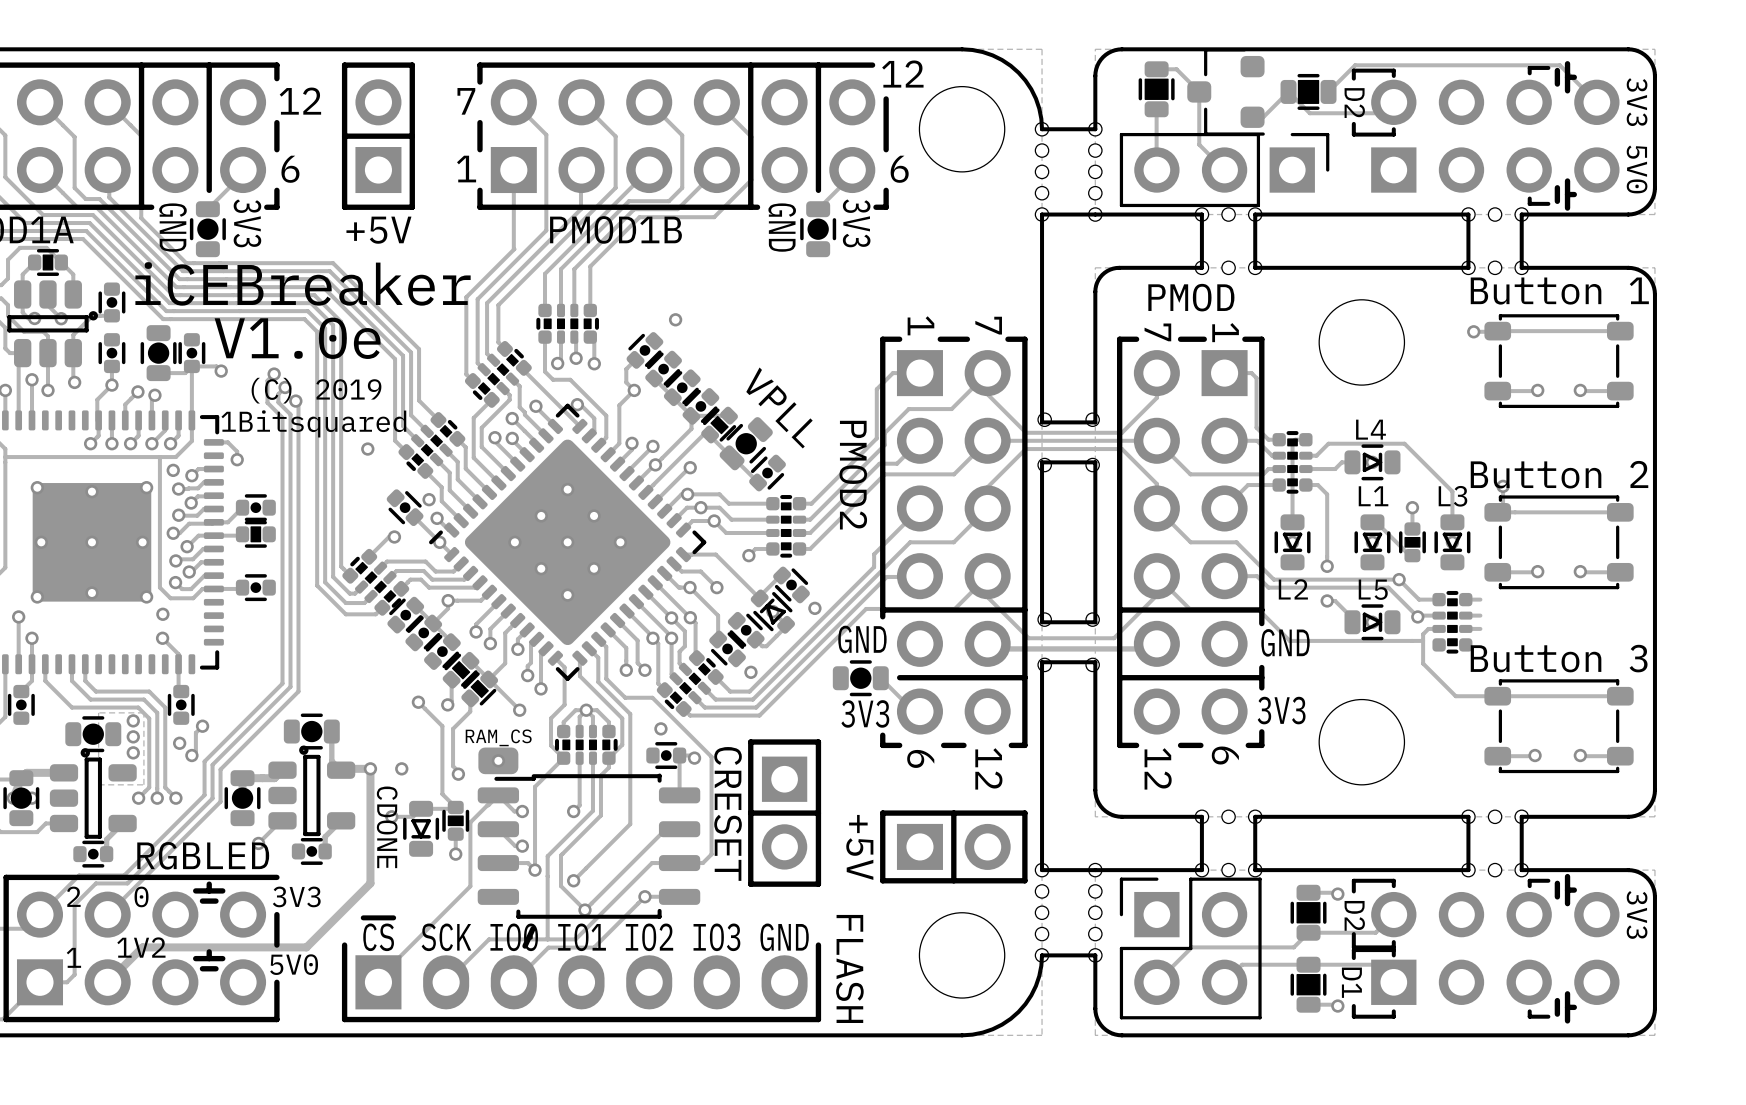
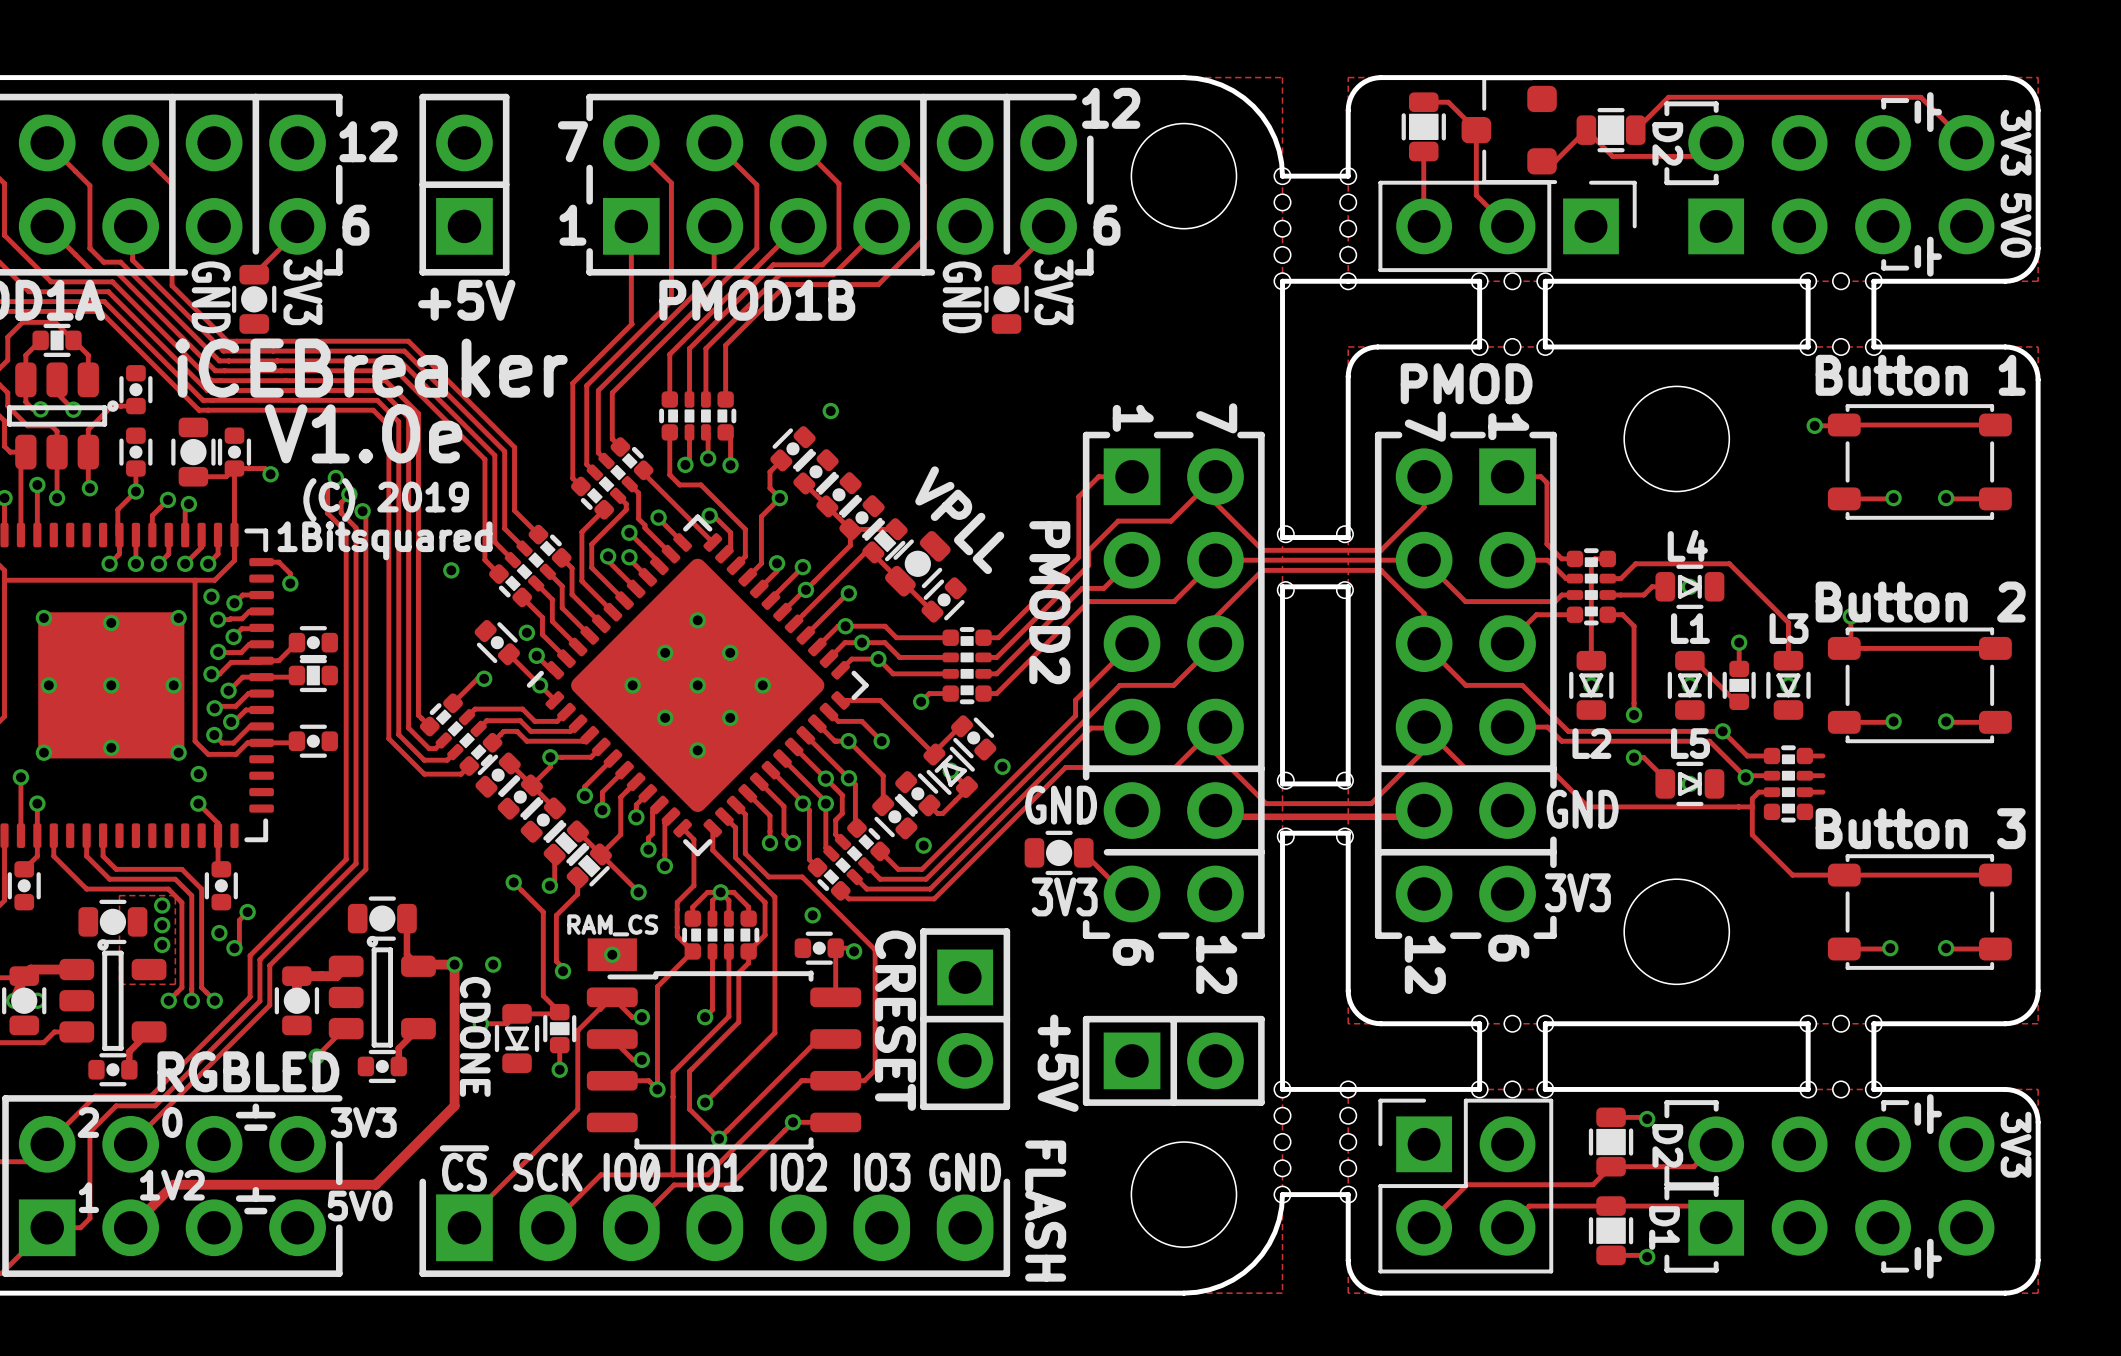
part footprint: [478, 747, 519, 775] -> [587, 938, 637, 972]

